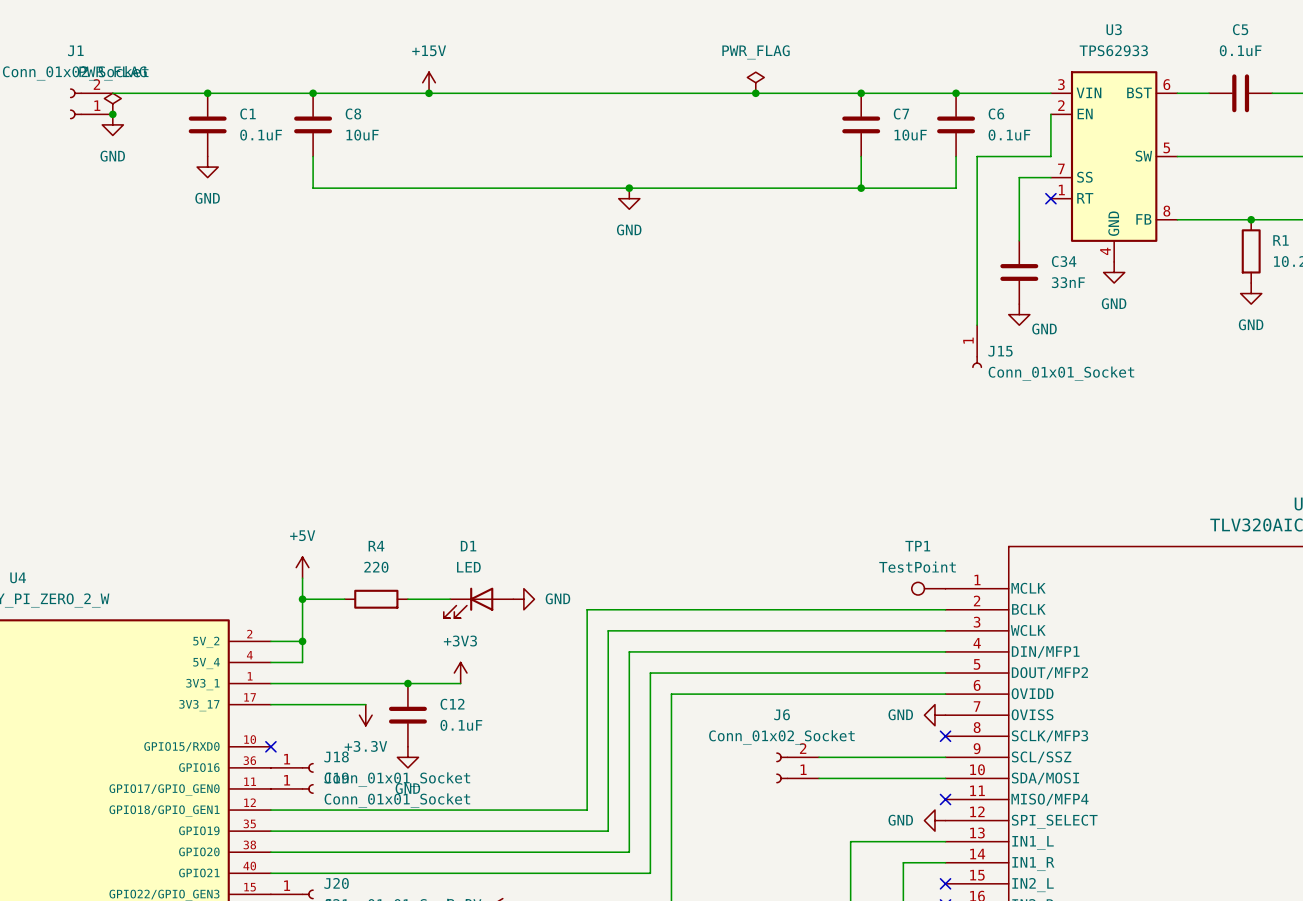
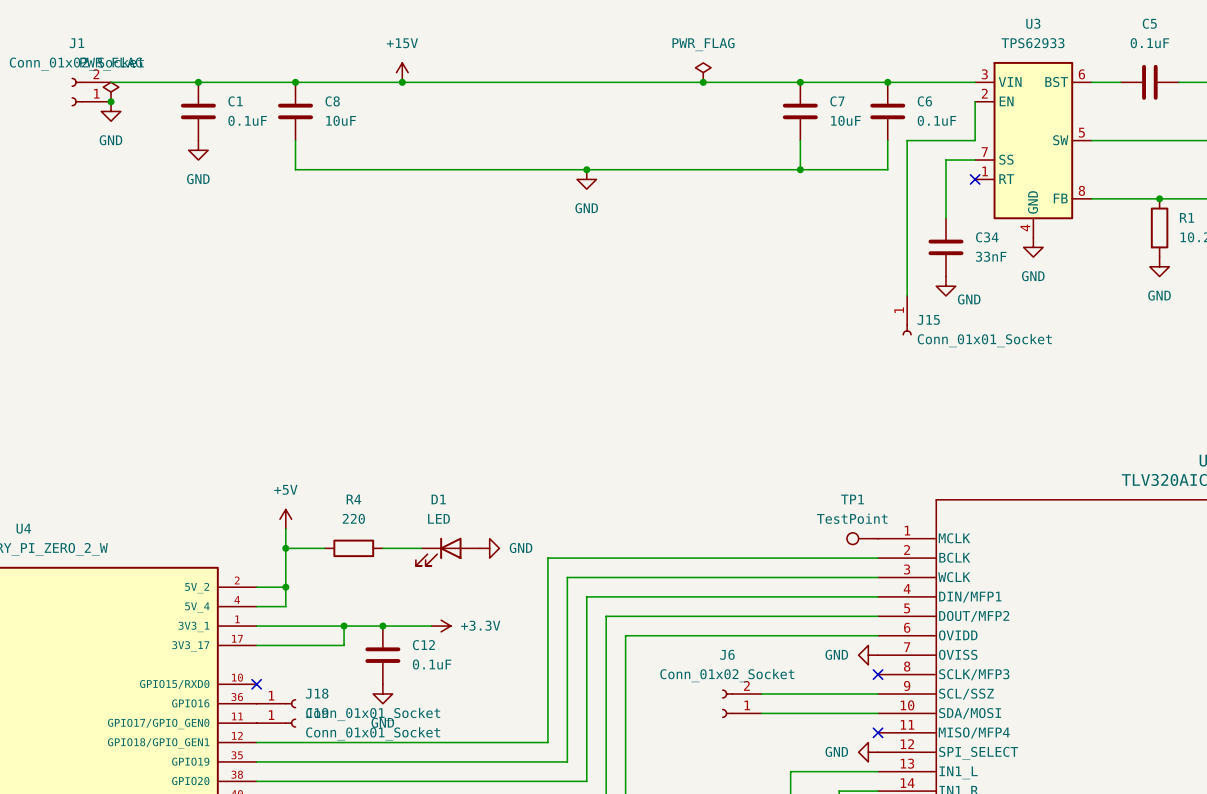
power symbol: +3V3 (460, 673) -> none
wire: none -> (344, 626) (344, 645)
junction: none -> (344, 626)
power symbol rotation: 0° (365, 715) -> 90° counterclockwise (441, 626)
power symbol position: +3.3V (365, 715) -> +3.3V (441, 626)
power symbol text position: +3.3V (365, 746) -> +3.3V (480, 625)

